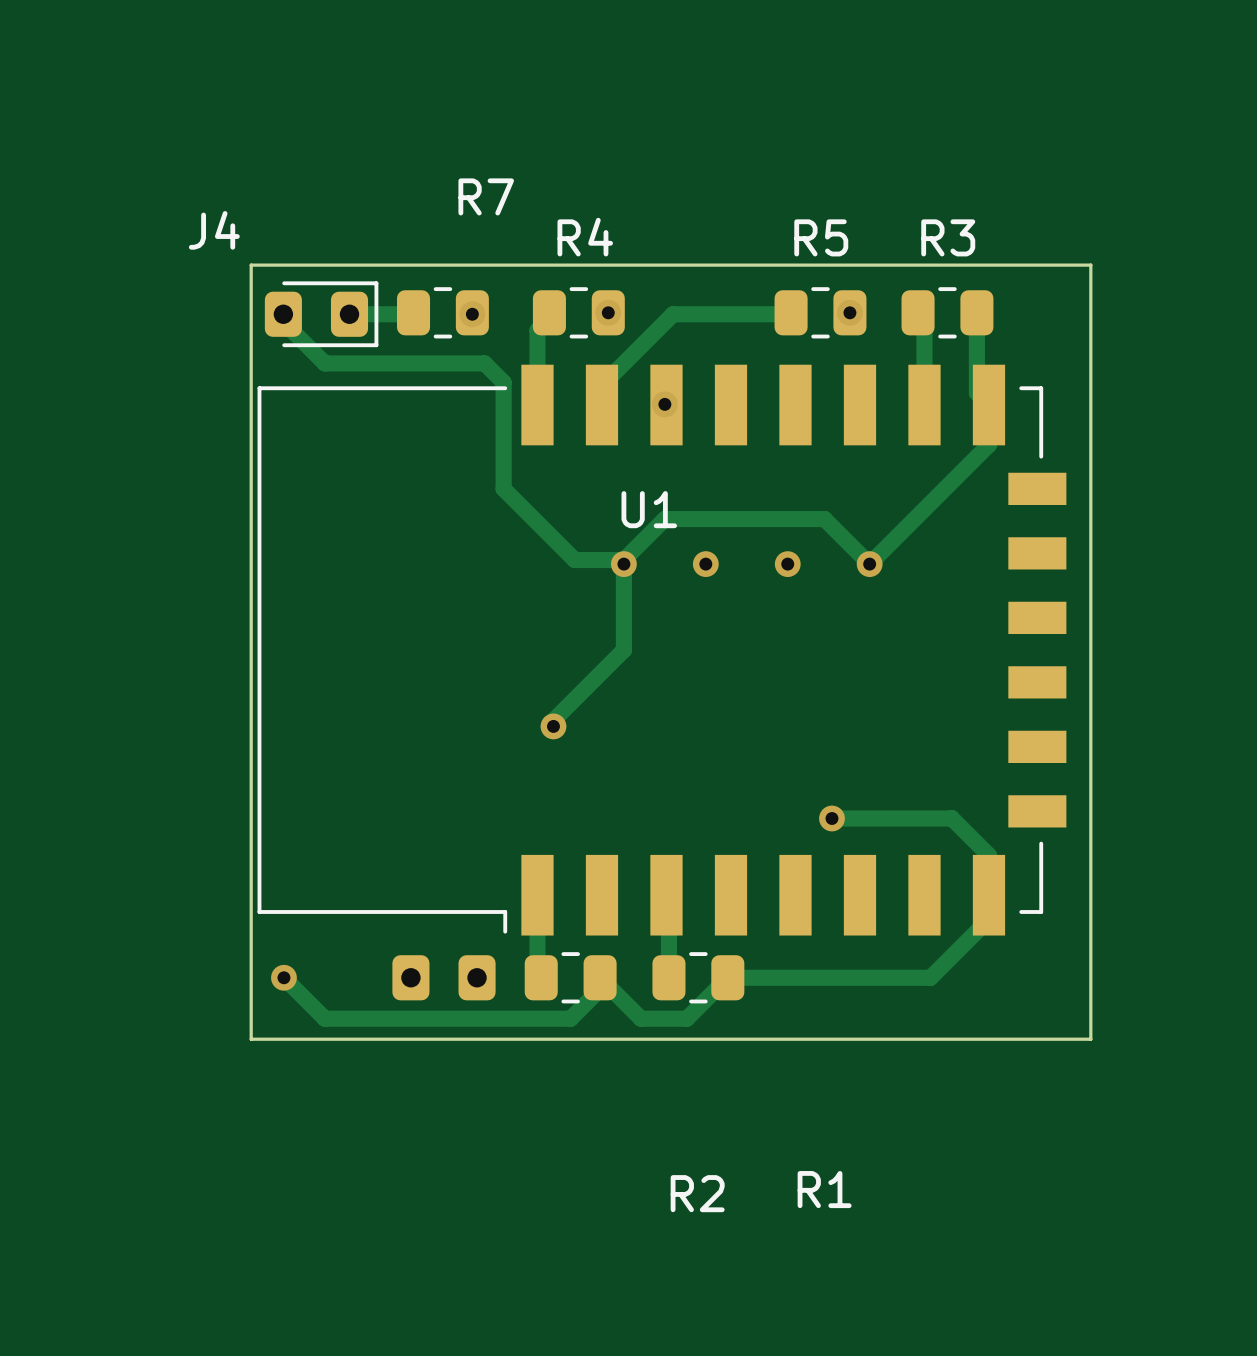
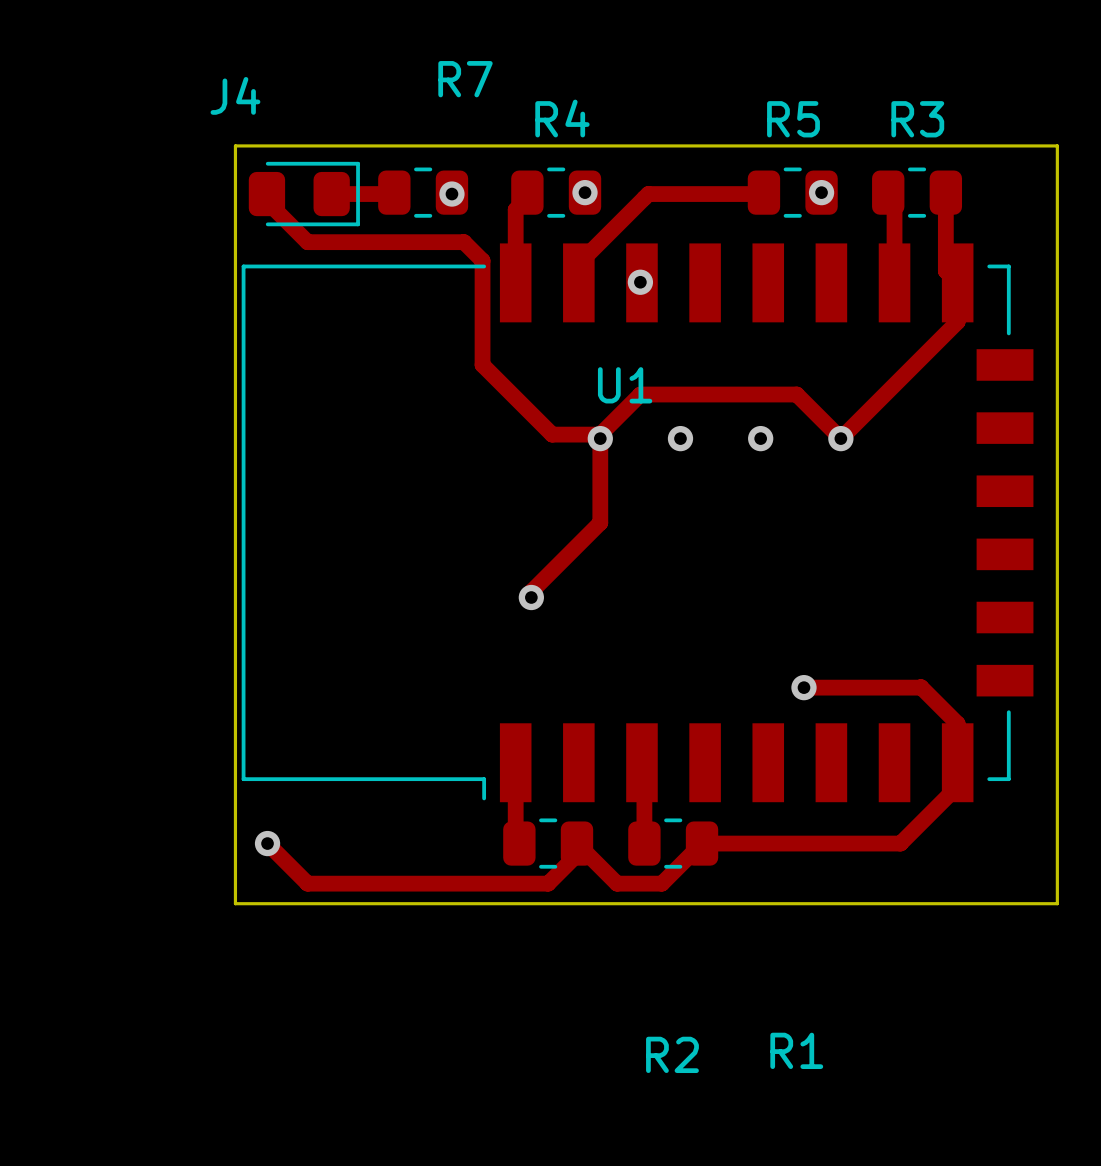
J4 footprint: [264, 281, 379, 348] -> [248, 161, 360, 227]
part: (443, 977) -> none

